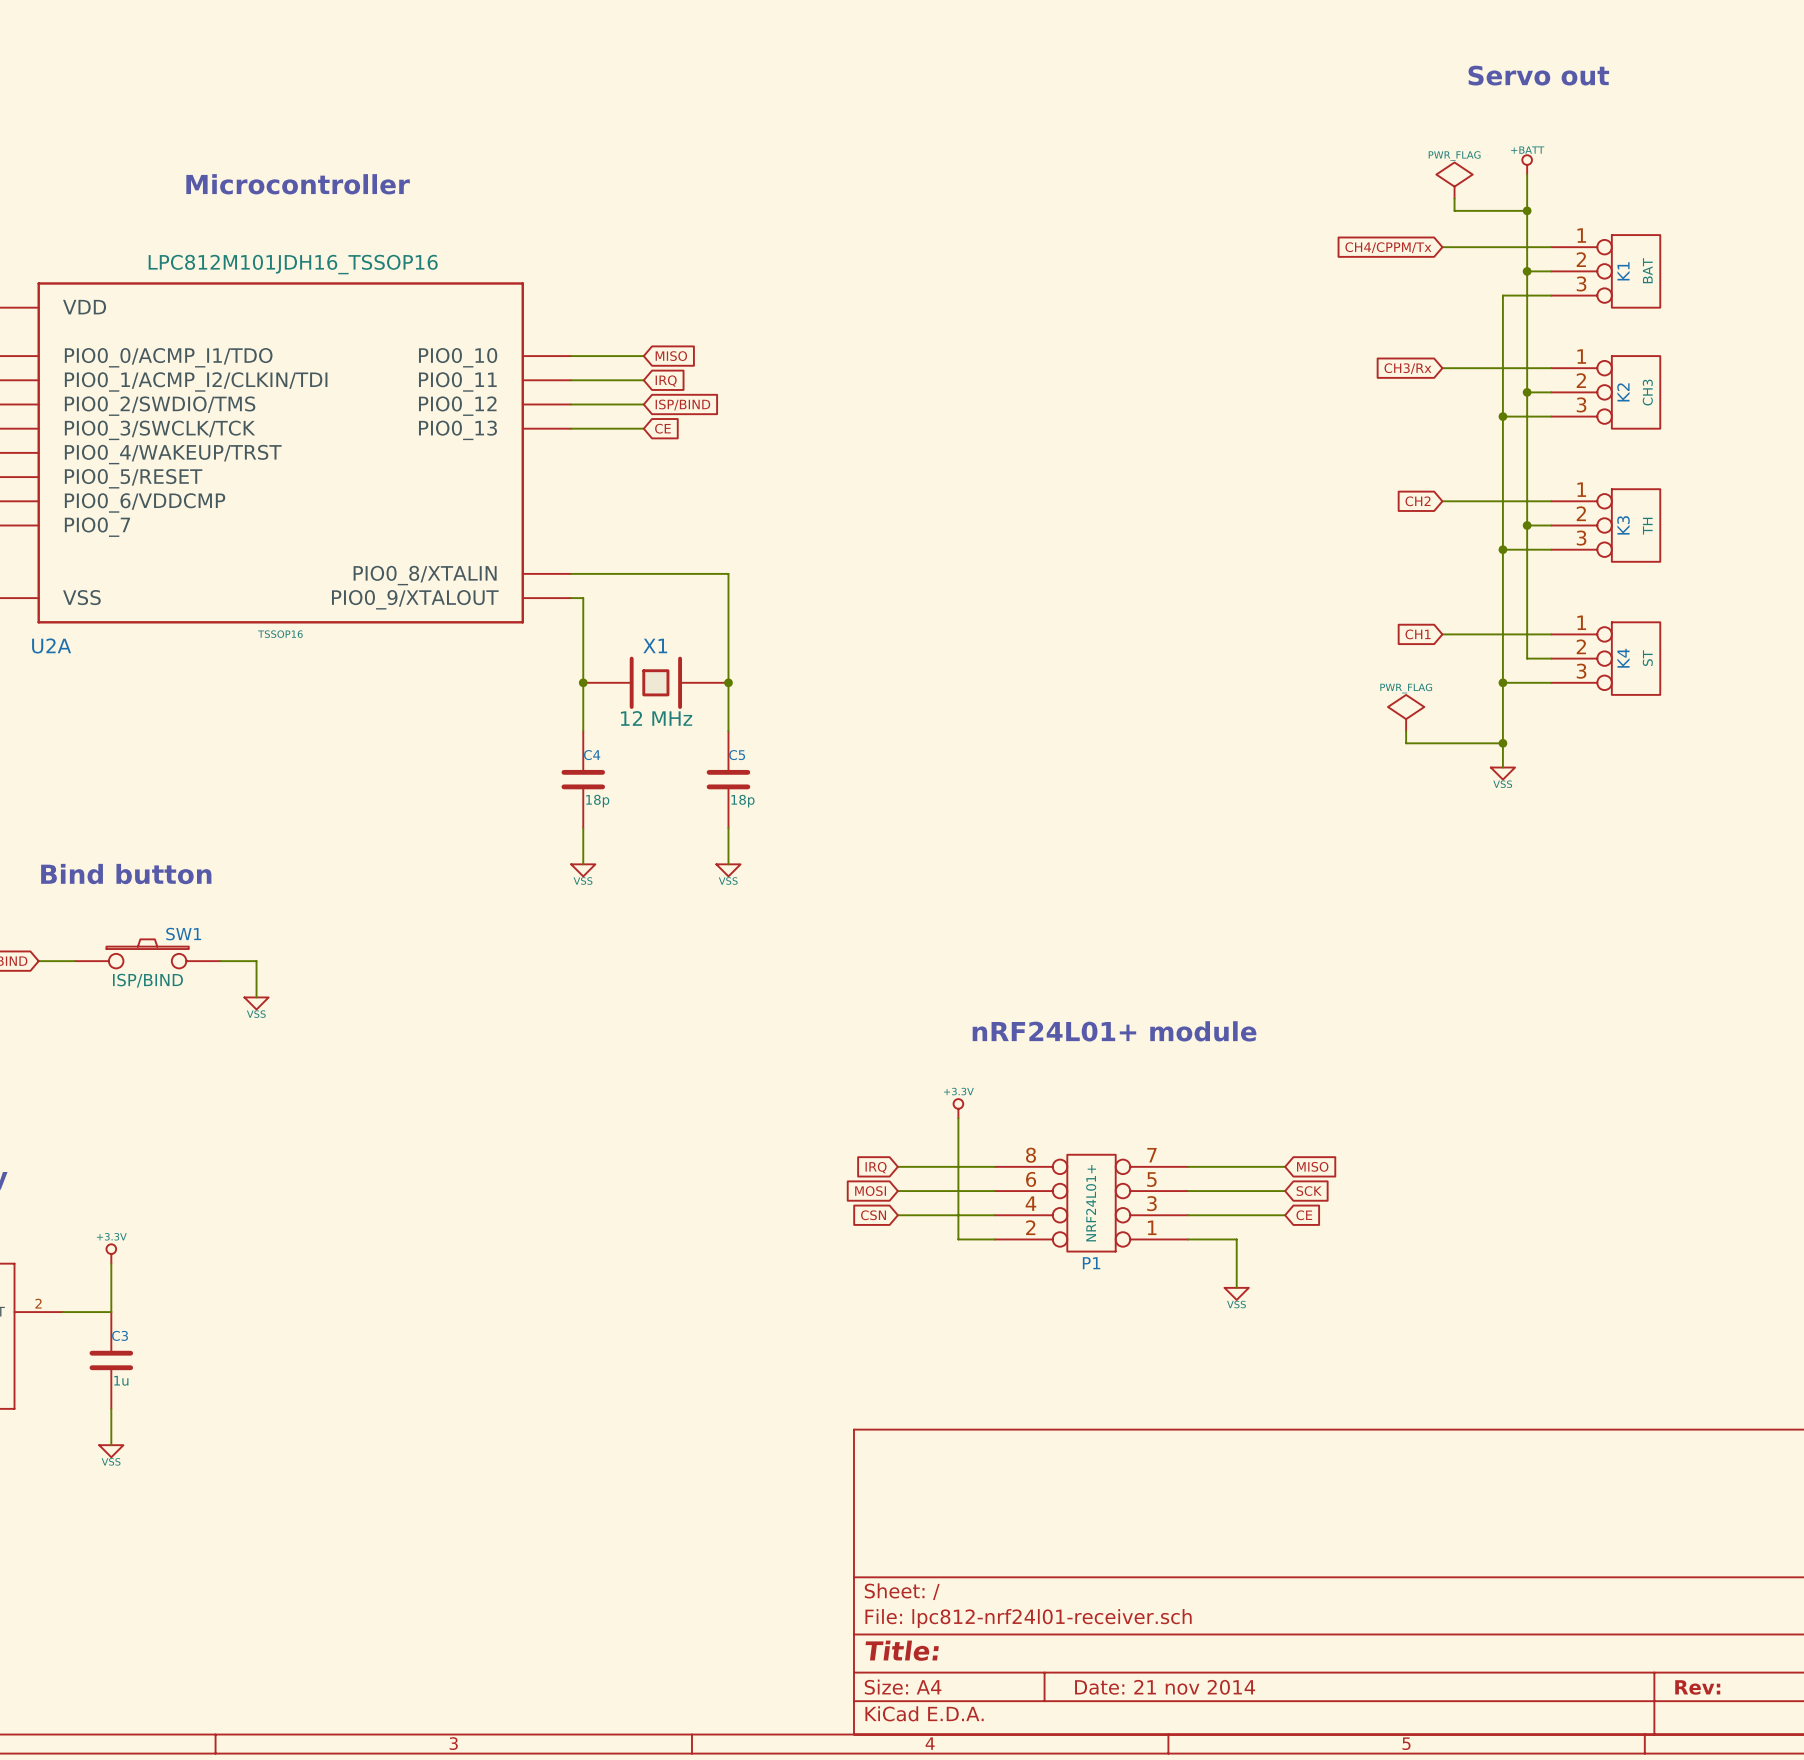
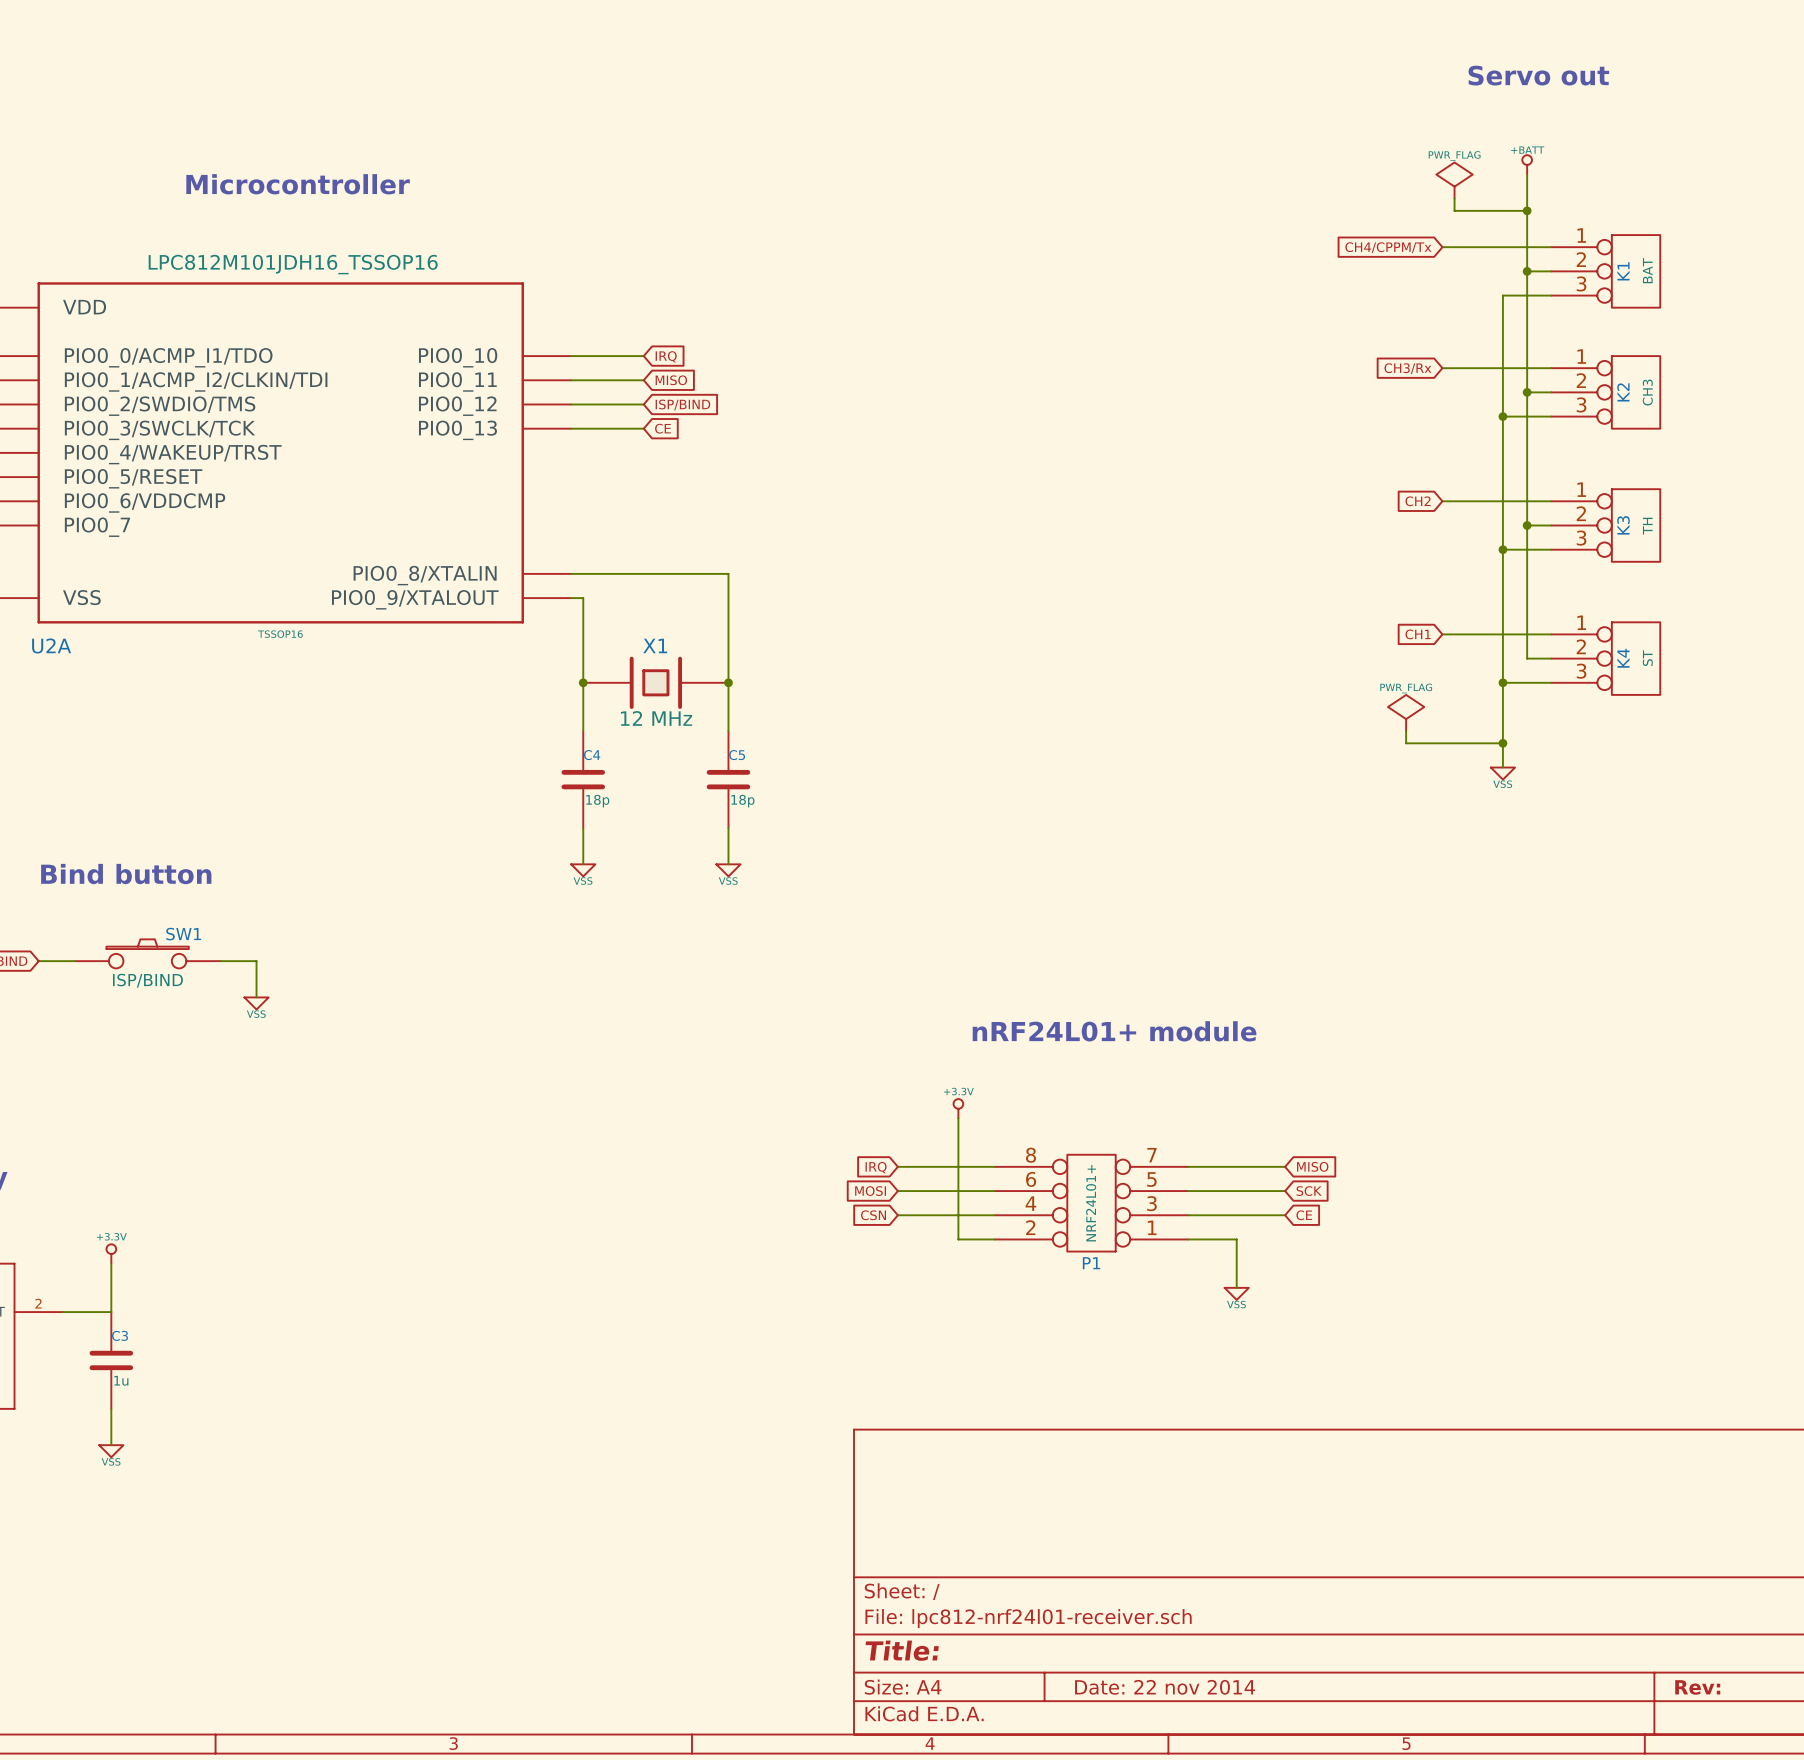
global label: MISO (671, 356) -> IRQ (666, 356)
global label: IRQ (666, 381) -> MISO (671, 380)
title block: Date: 21 nov 2014 (1165, 1687) -> Date: 22 nov 2014 (1165, 1687)

